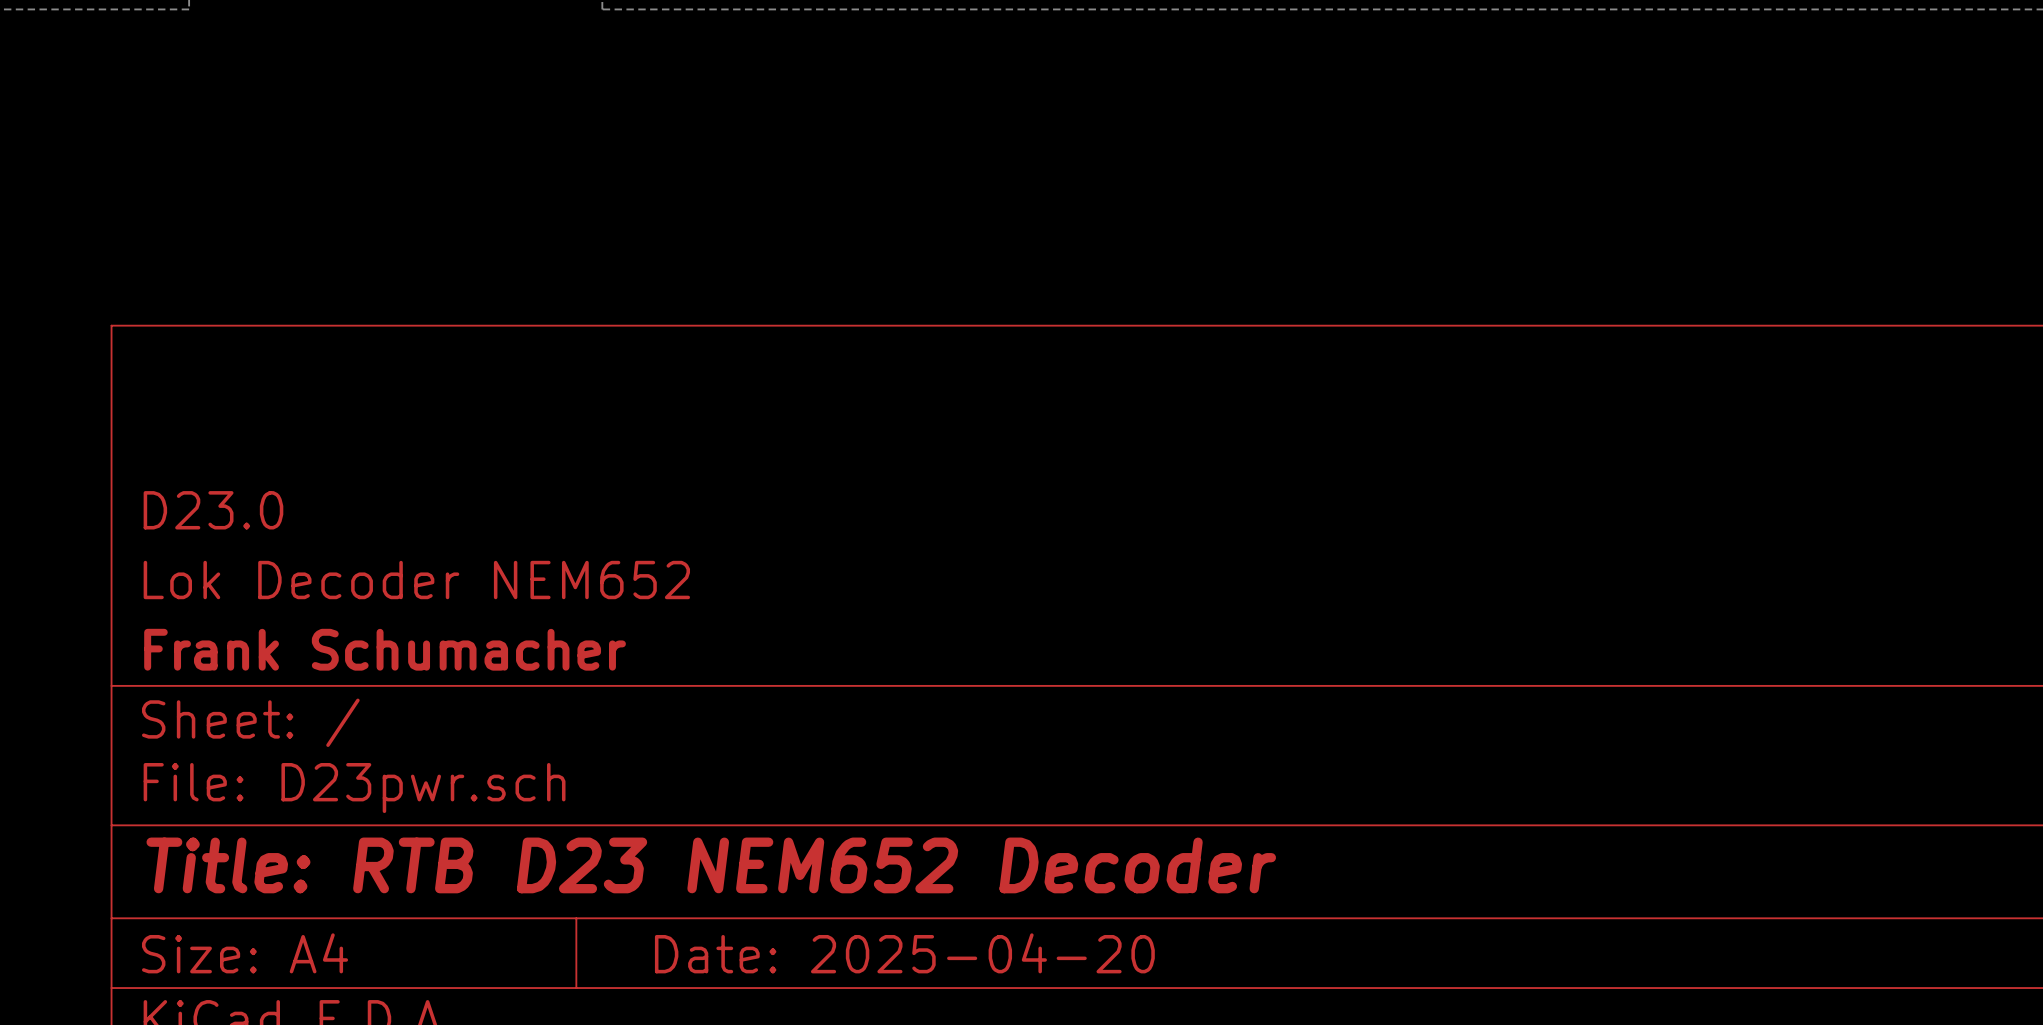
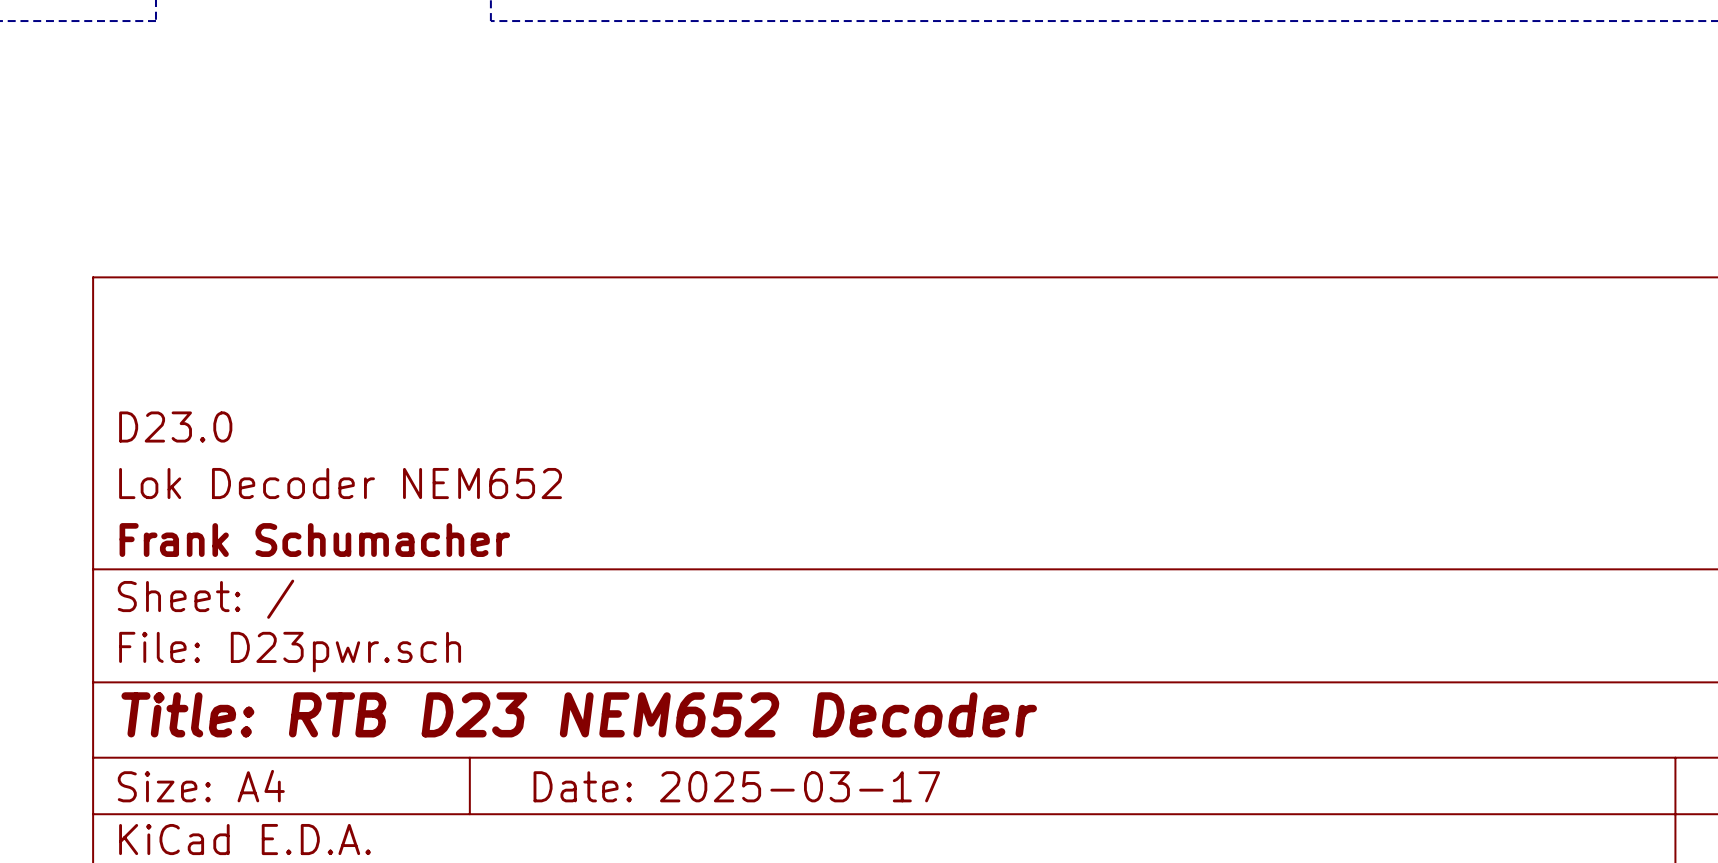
title block: Date: 2025-04-20 (904, 953) -> Date: 2025-03-17 (736, 786)

